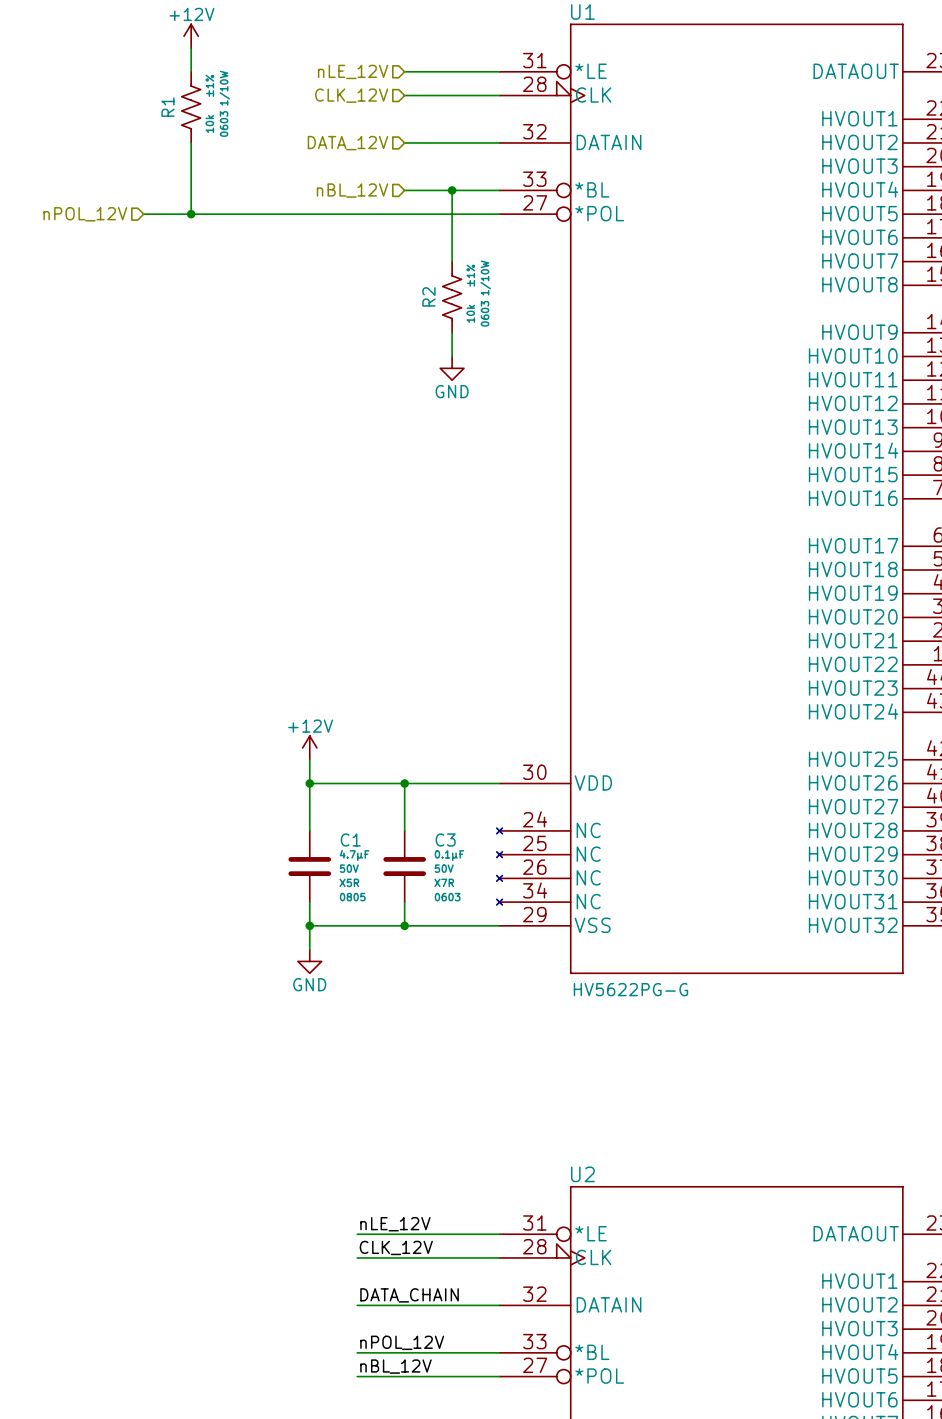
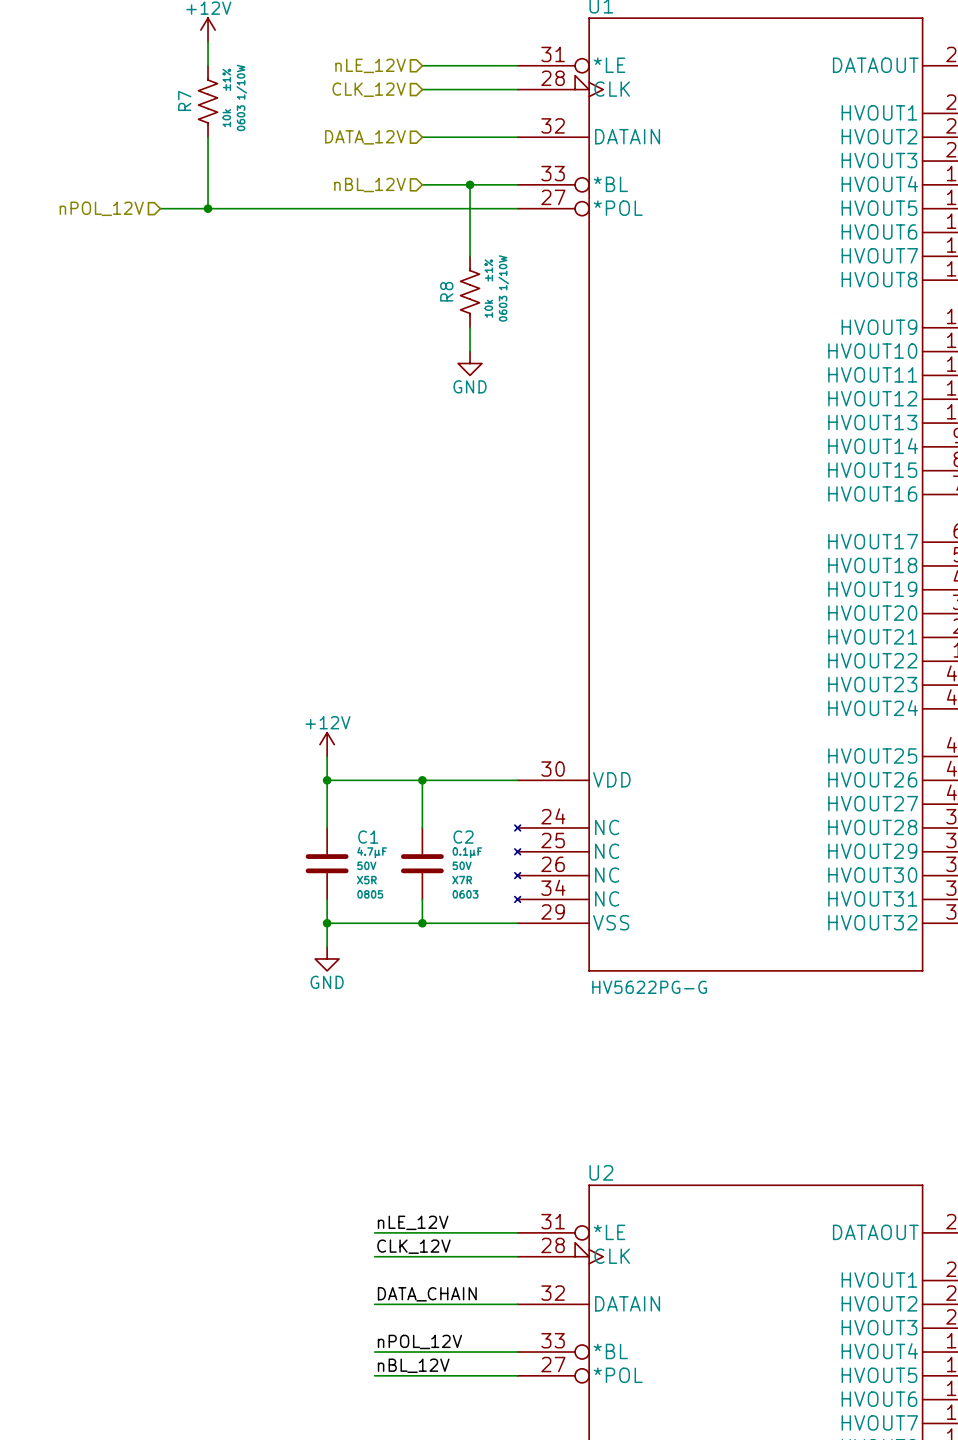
R1 name: R1 (167, 107) -> R7 (184, 100)
R2 name: R2 (428, 296) -> R8 (446, 291)
C3 name: C3 (445, 839) -> C2 (463, 837)

